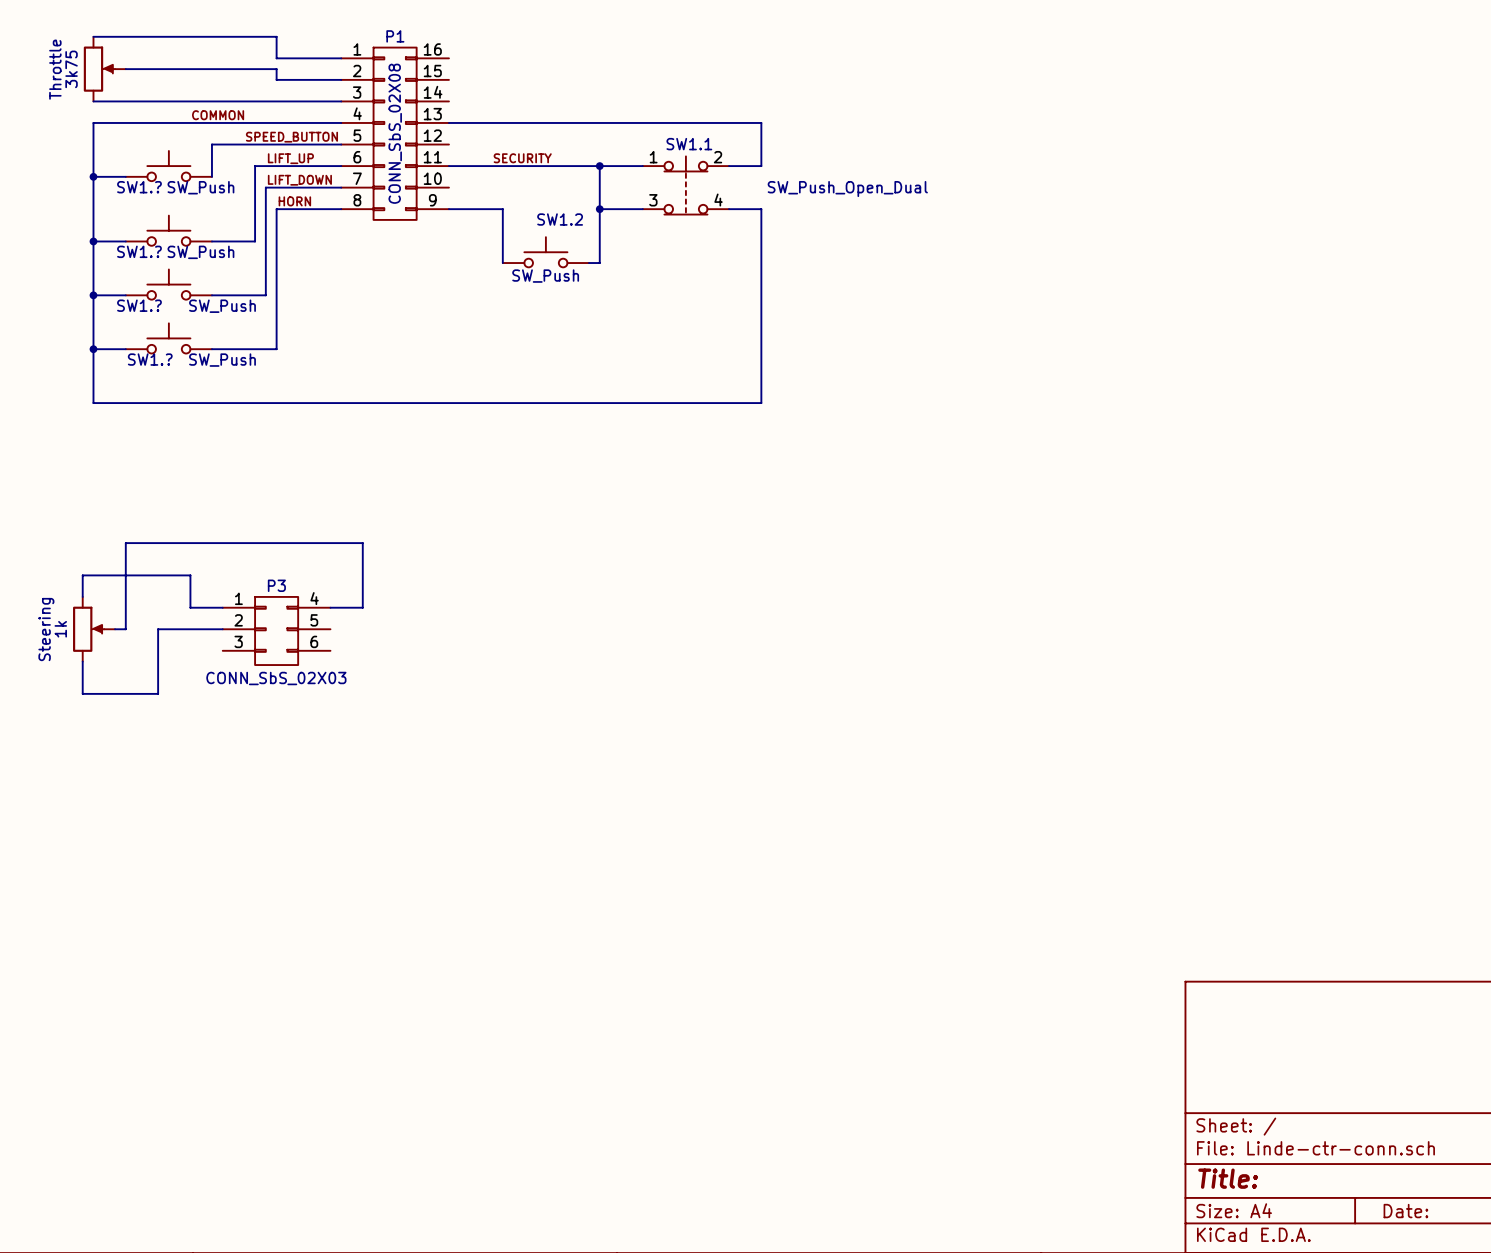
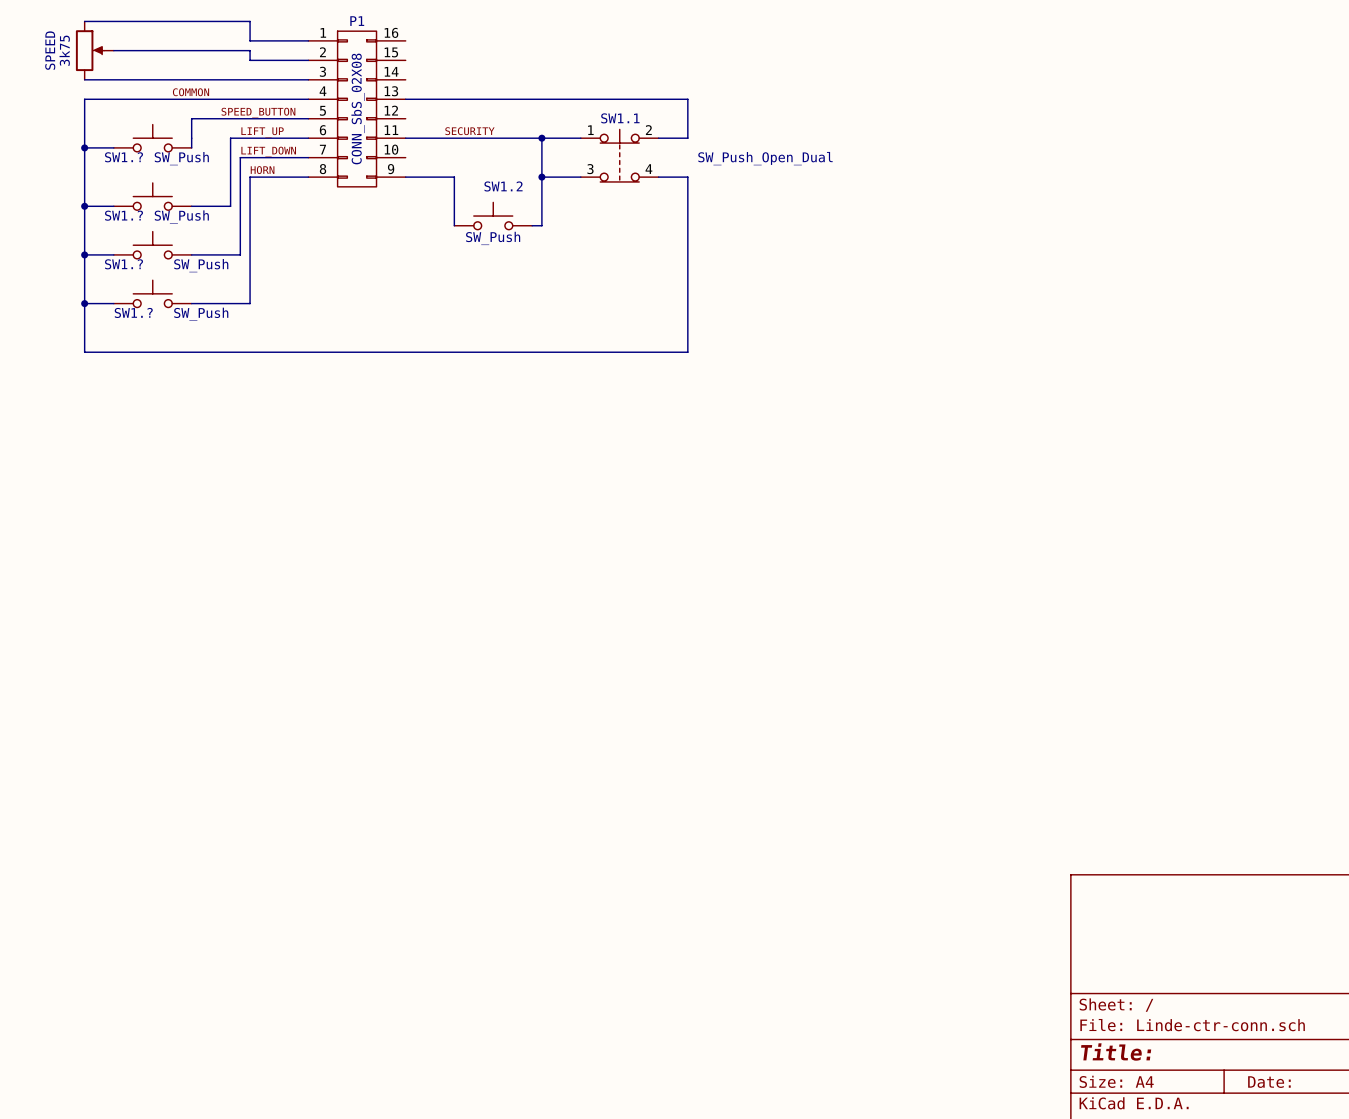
Throttle name: Throttle (55, 69) -> SPEED (50, 50)
wire: (82, 596) (82, 575) (190, 575) (190, 607) (222, 607) -> none
wire: (330, 607) (362, 607) (362, 543) (125, 543) (125, 629) (115, 629) -> none
Steering: 1k (94, 629) -> none
wire: (222, 629) (158, 629) (158, 693) (82, 693) (82, 661) -> none
P3: CONN_SbS_02X03 (276, 630) -> none

